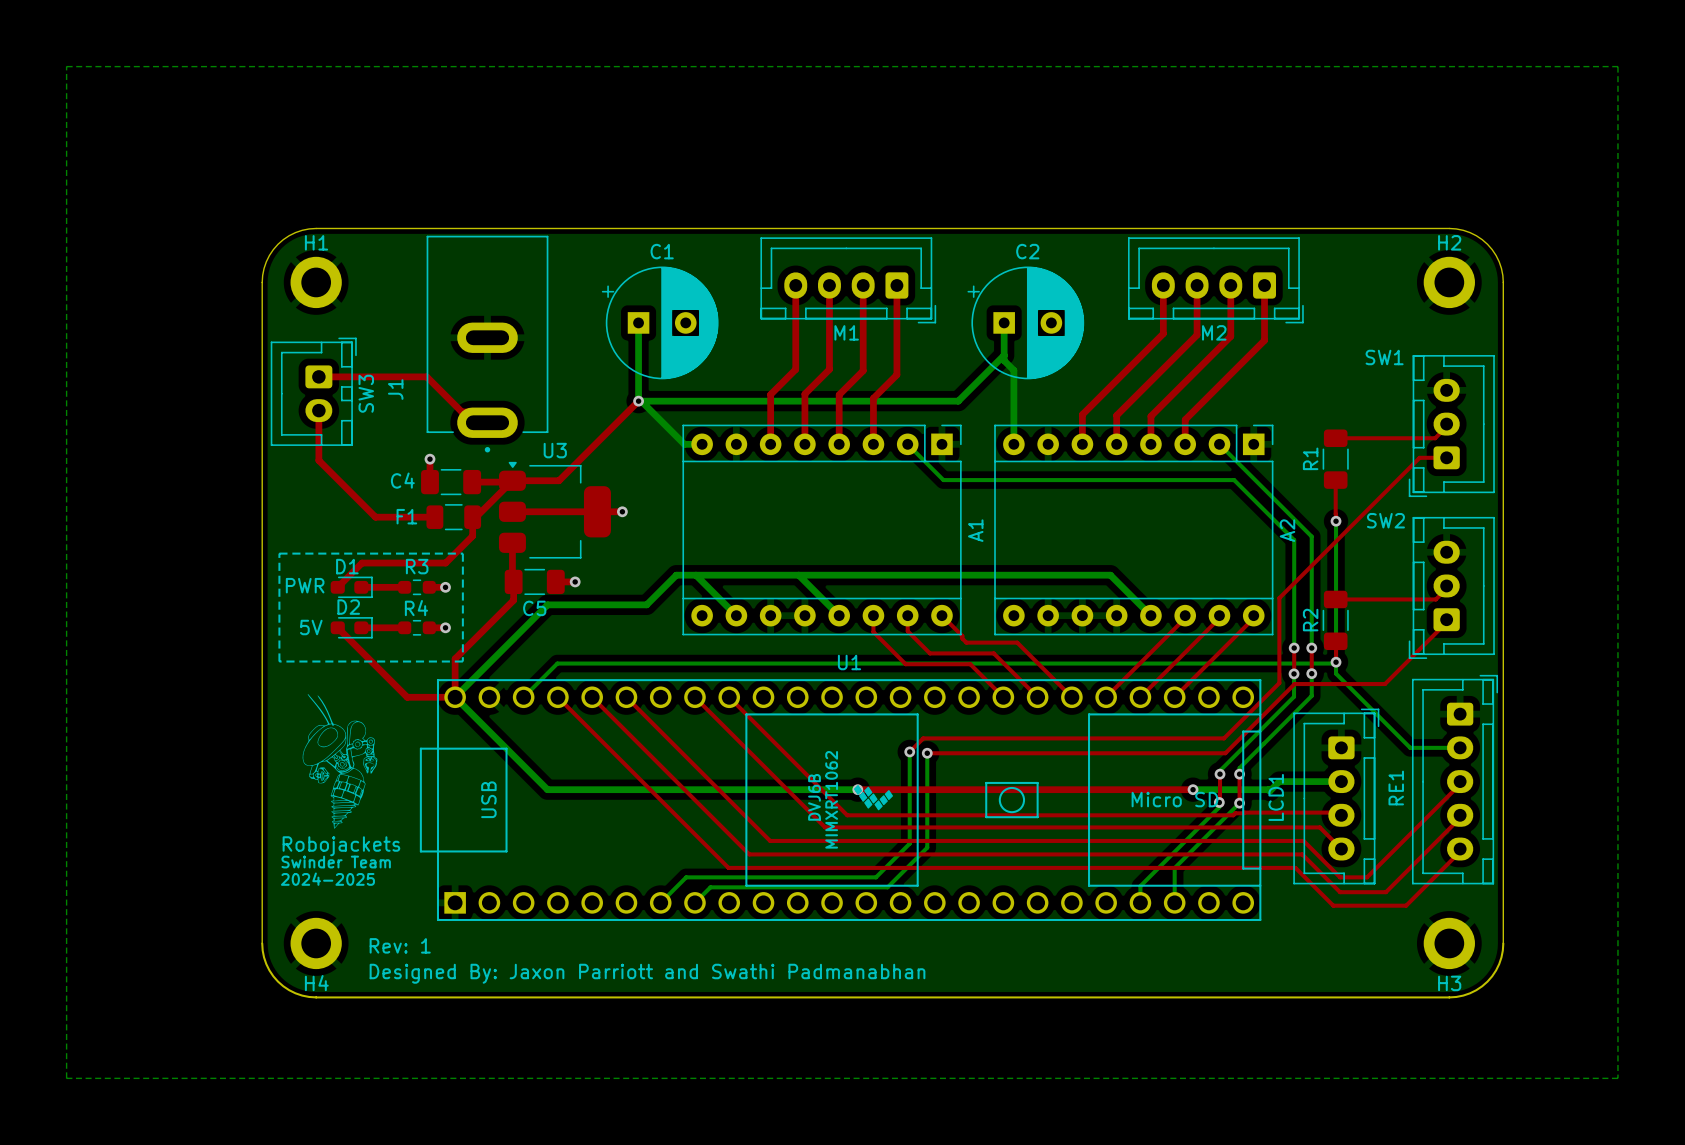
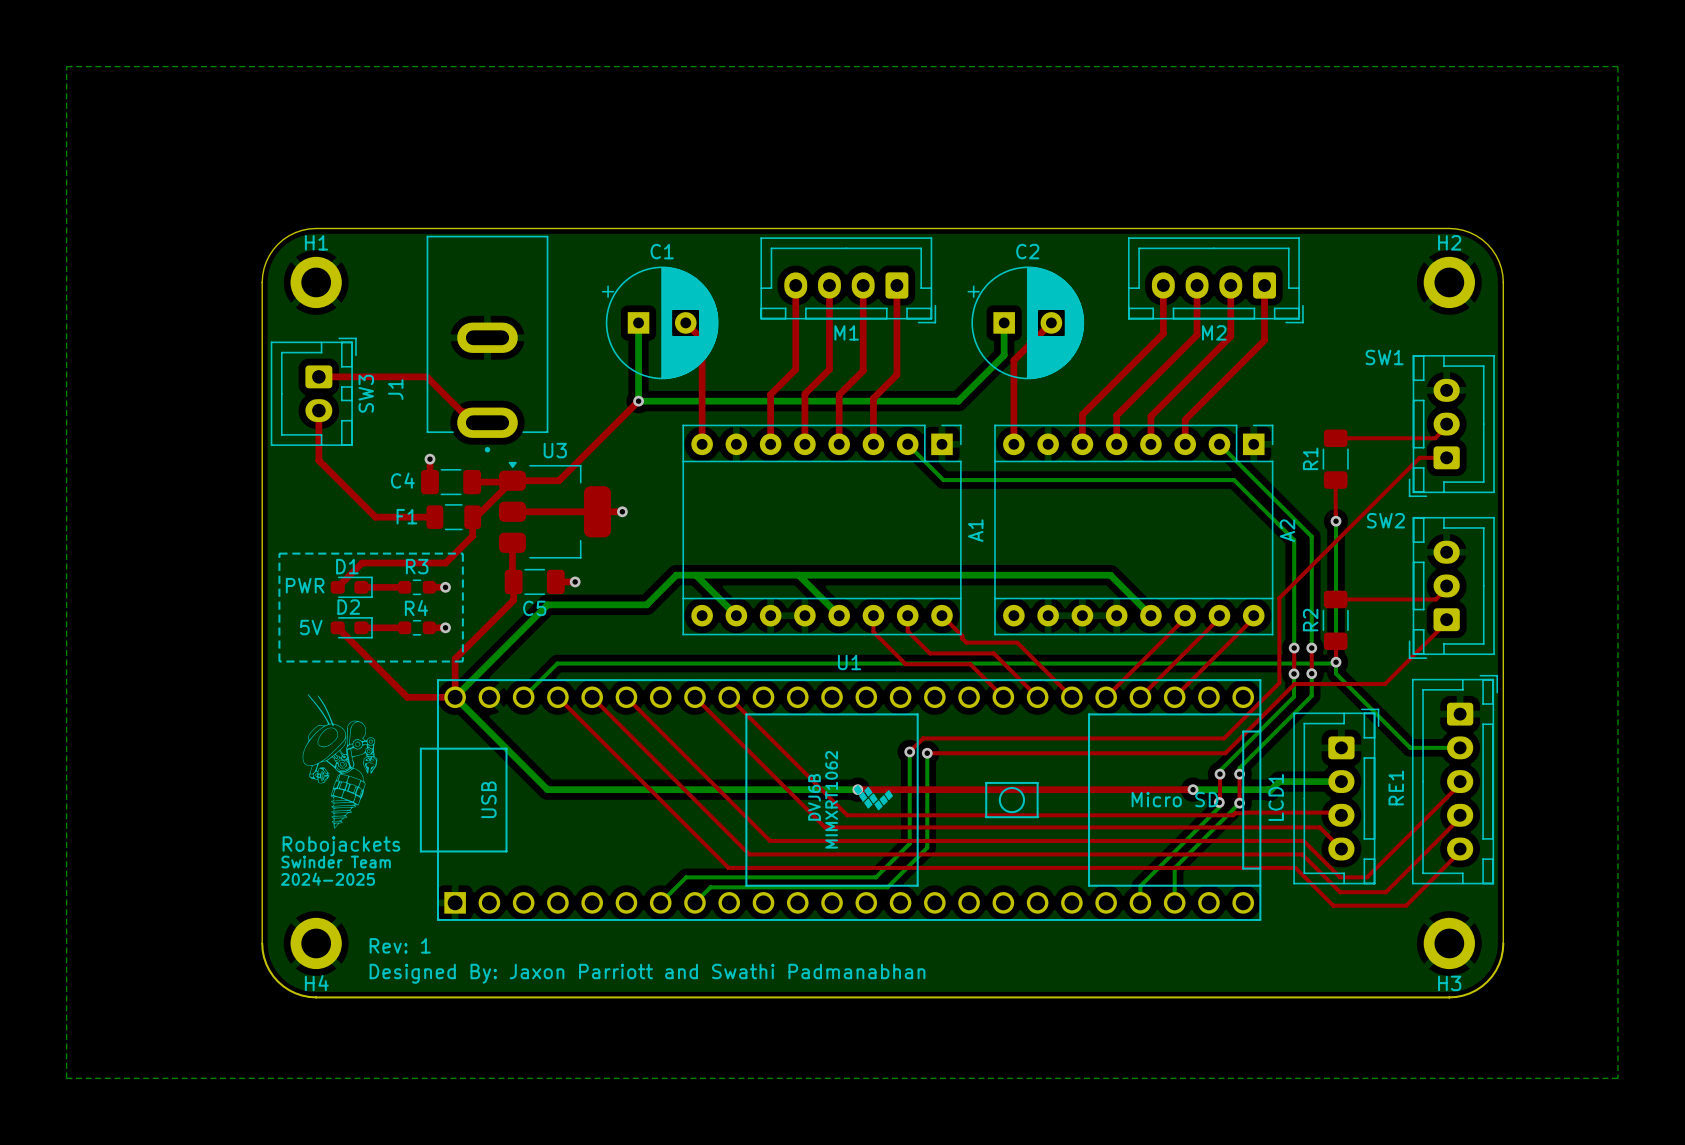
top track: none -> (685, 322) (702, 339) (702, 444)
top track: none -> (1051, 322) (1013, 360) (1013, 444)
bottom track: (1004, 355) (1004, 360) (1013, 370) (1013, 444) -> none
bottom track: (641, 401) (684, 444) (702, 444) -> none

